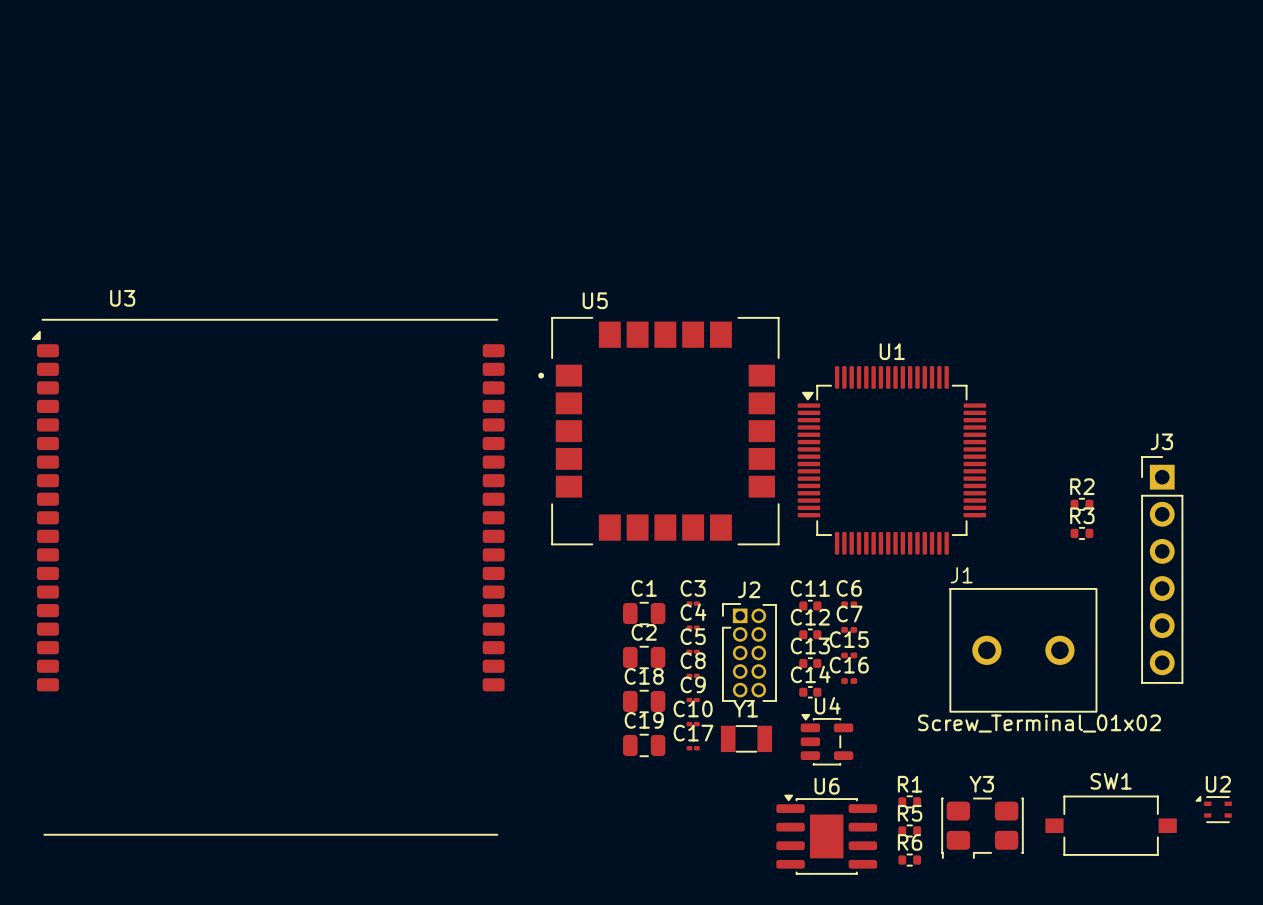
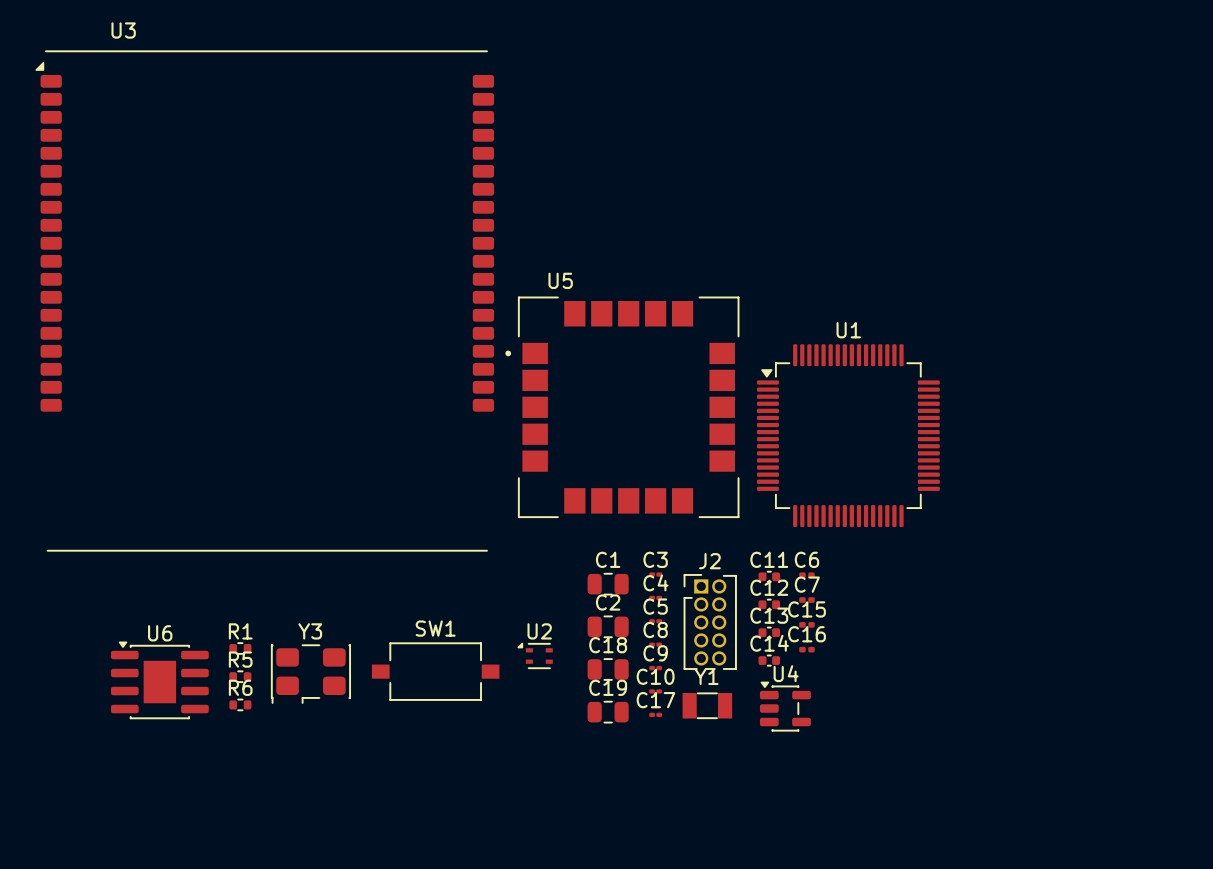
R2: (1082, 504) -> none
R3: (1082, 533) -> none
J3: (1162, 569) -> none
U3 position: (268, 577) -> (264, 301)
J1: Screw_Terminal_01x02 (1023, 650) -> none
R1 position: (909, 801) -> (240, 648)
U2 position: (1213, 809) -> (535, 655)
SW1 position: (1111, 825) -> (435, 671)
Y3 position: (982, 828) -> (310, 674)
R5 position: (909, 830) -> (240, 676)
U6 position: (826, 834) -> (159, 680)
R6 position: (909, 860) -> (240, 704)

